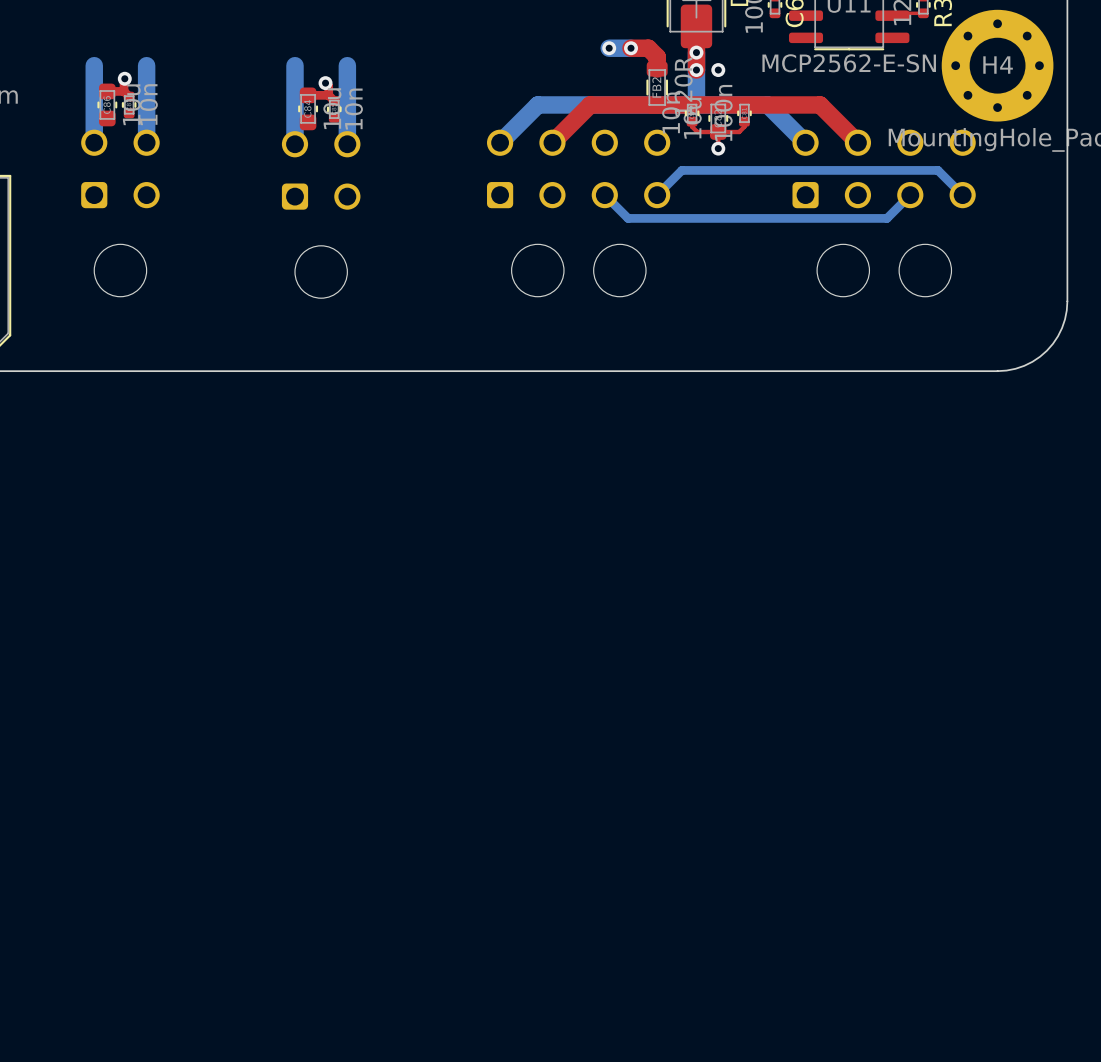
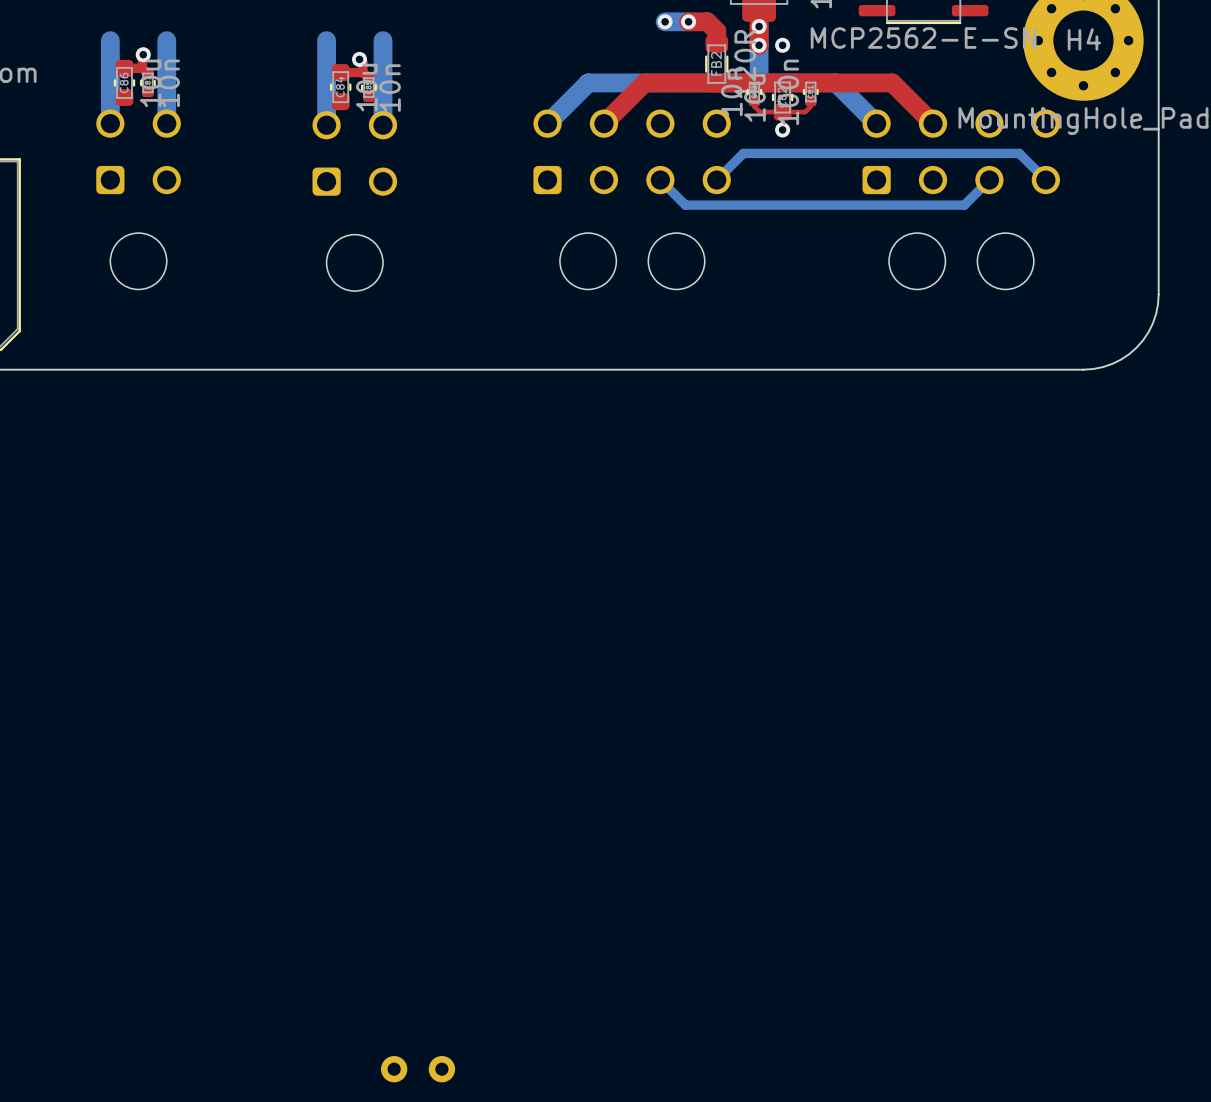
part: none -> (418, 1069)

